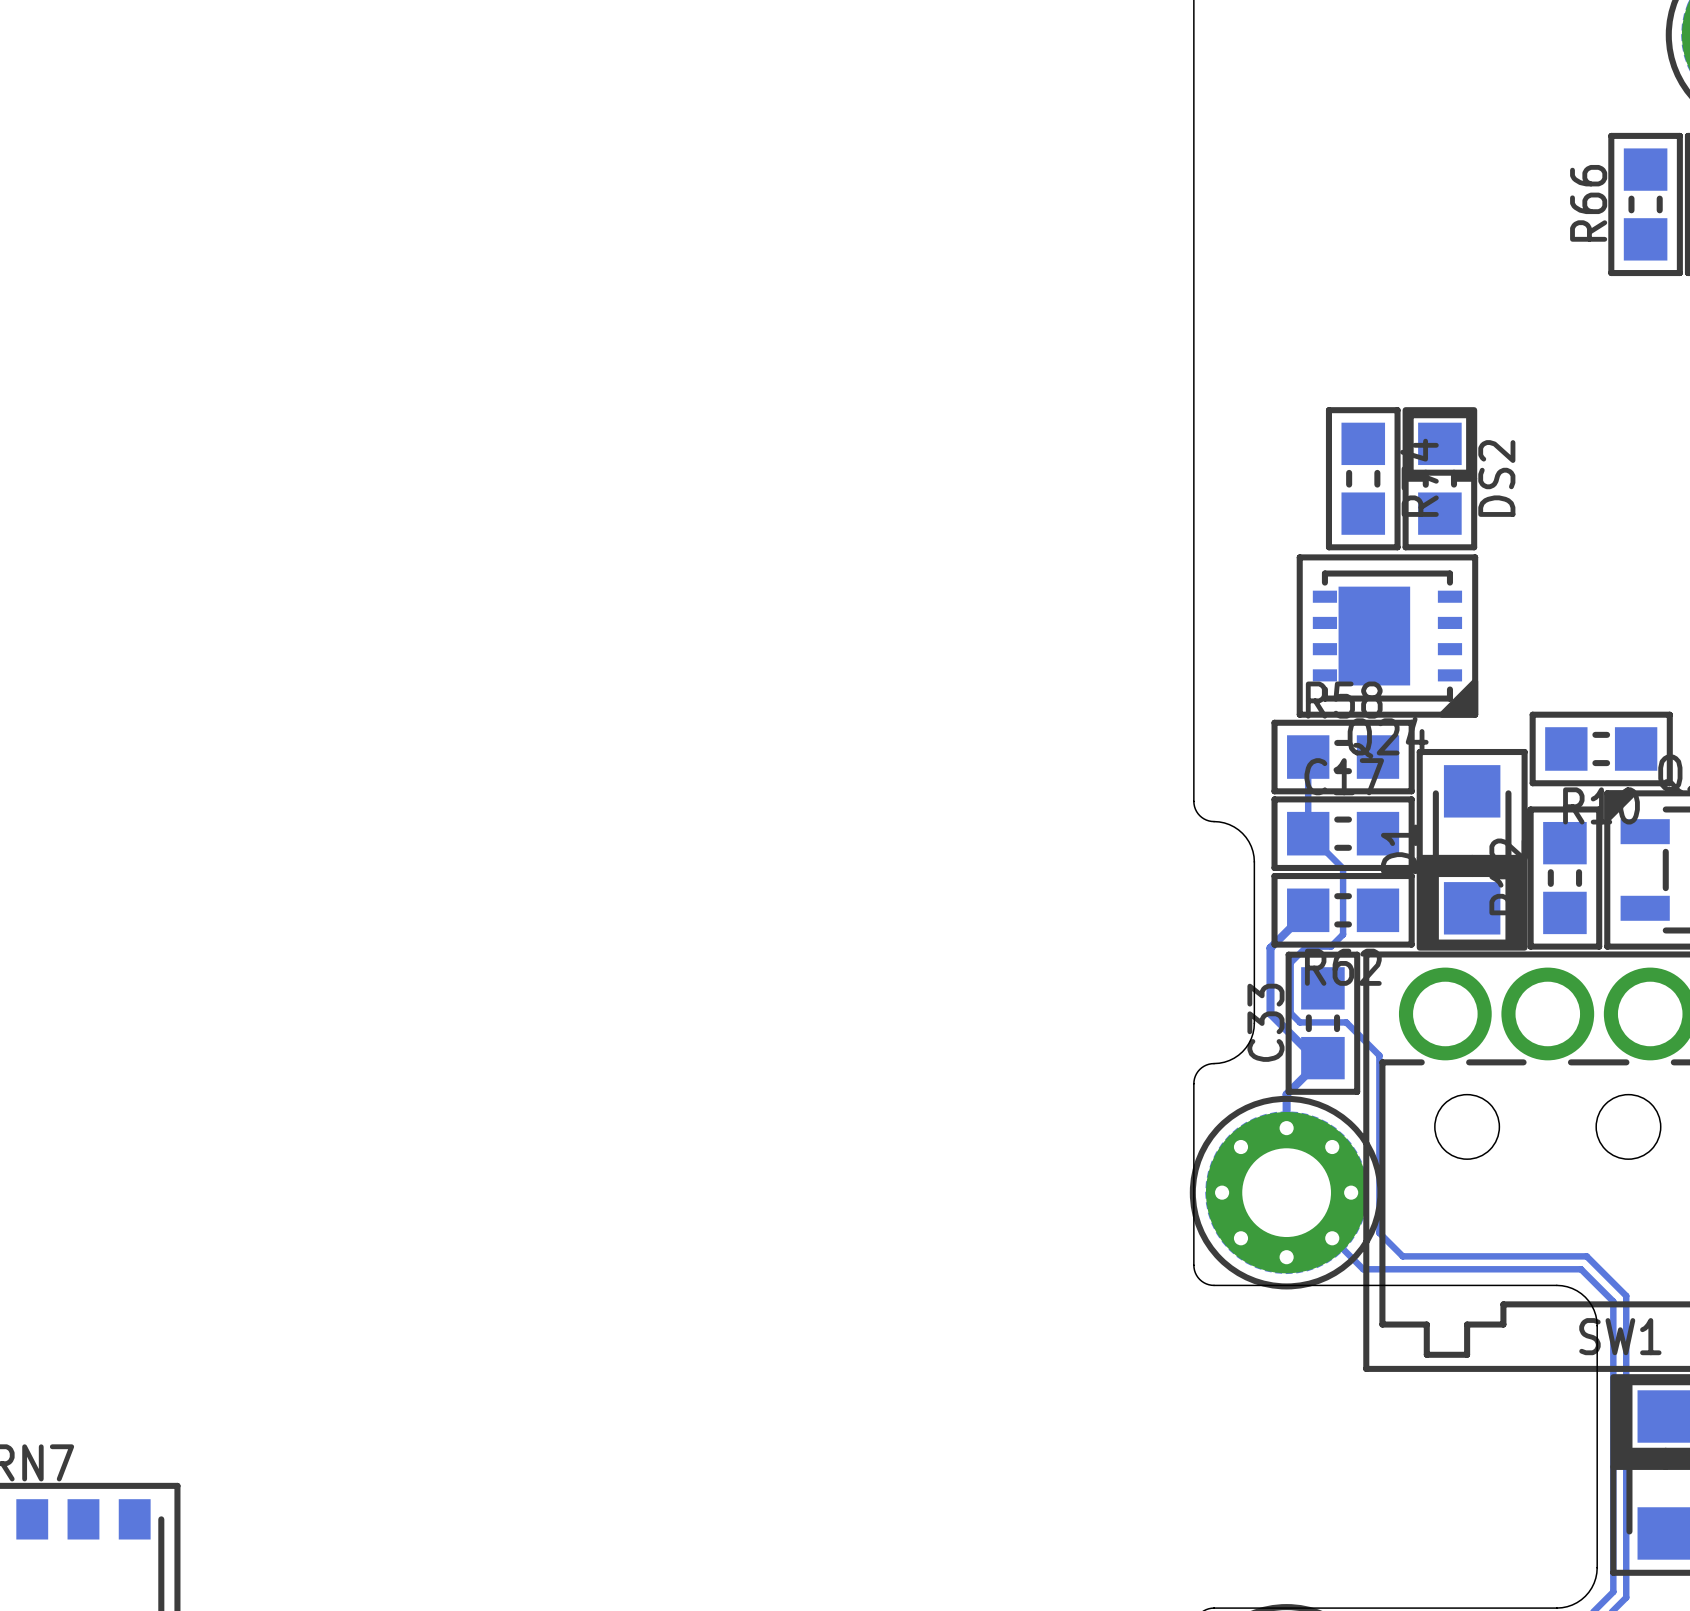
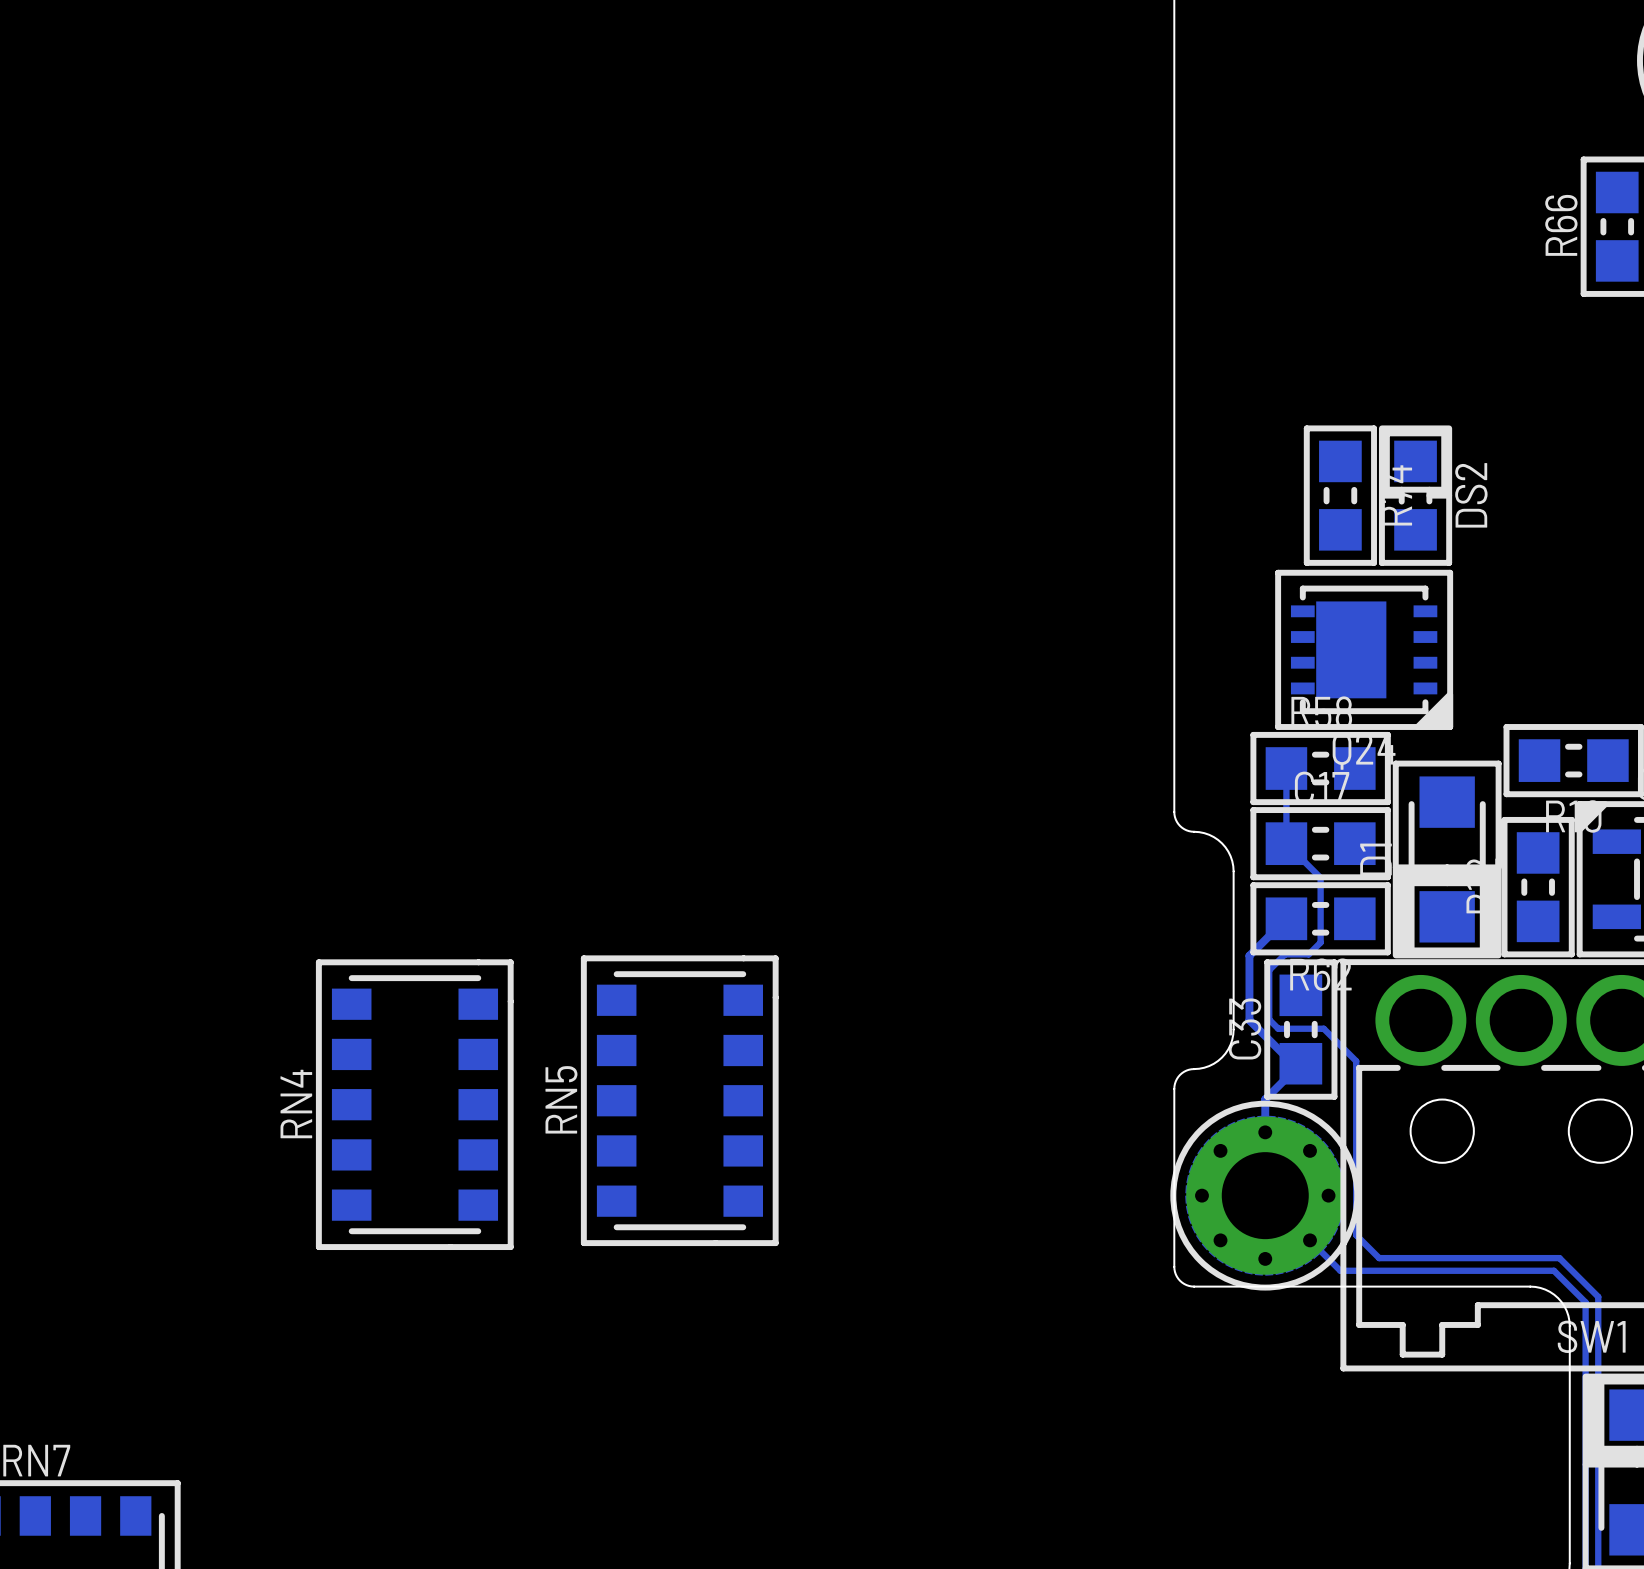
RN5: none -> (679, 1100)
RN4: none -> (414, 1104)

